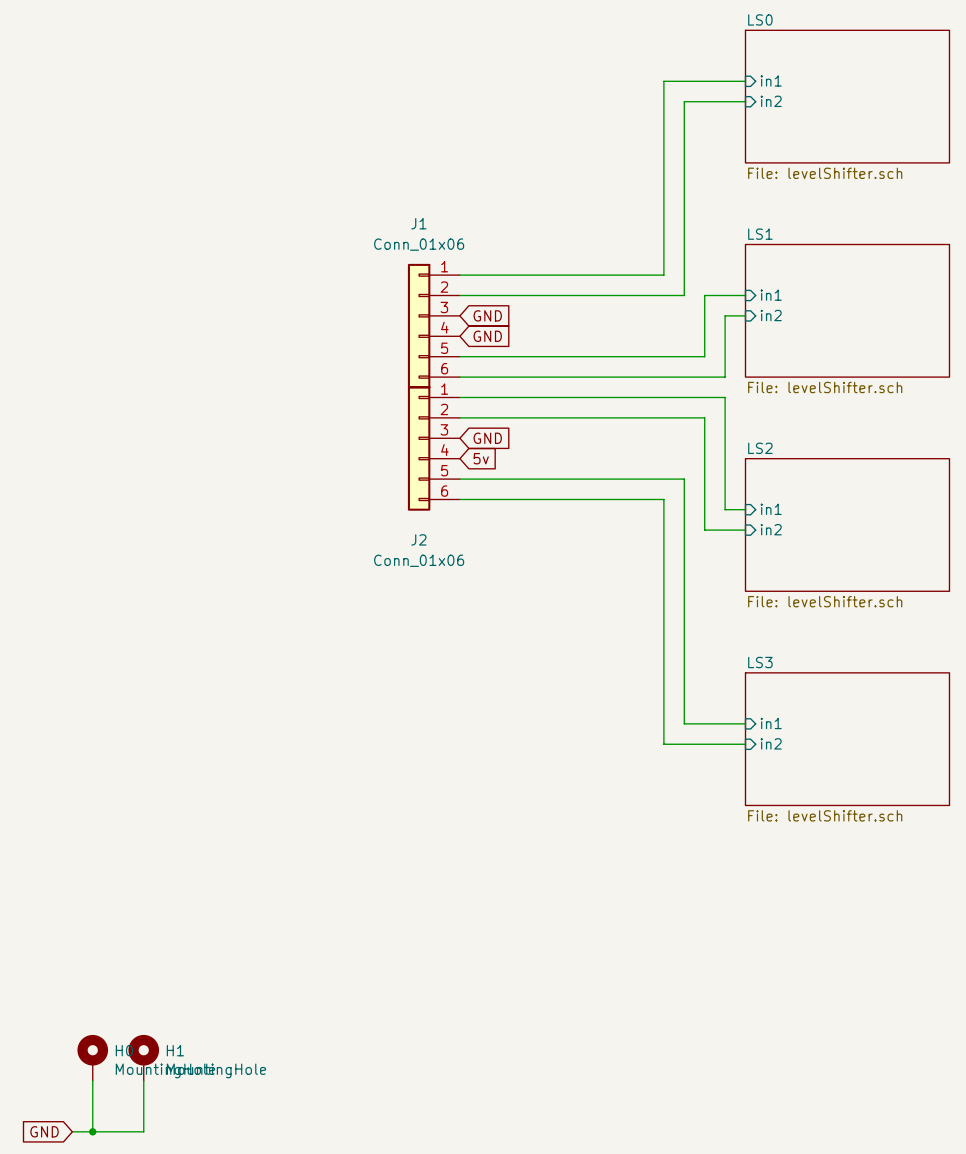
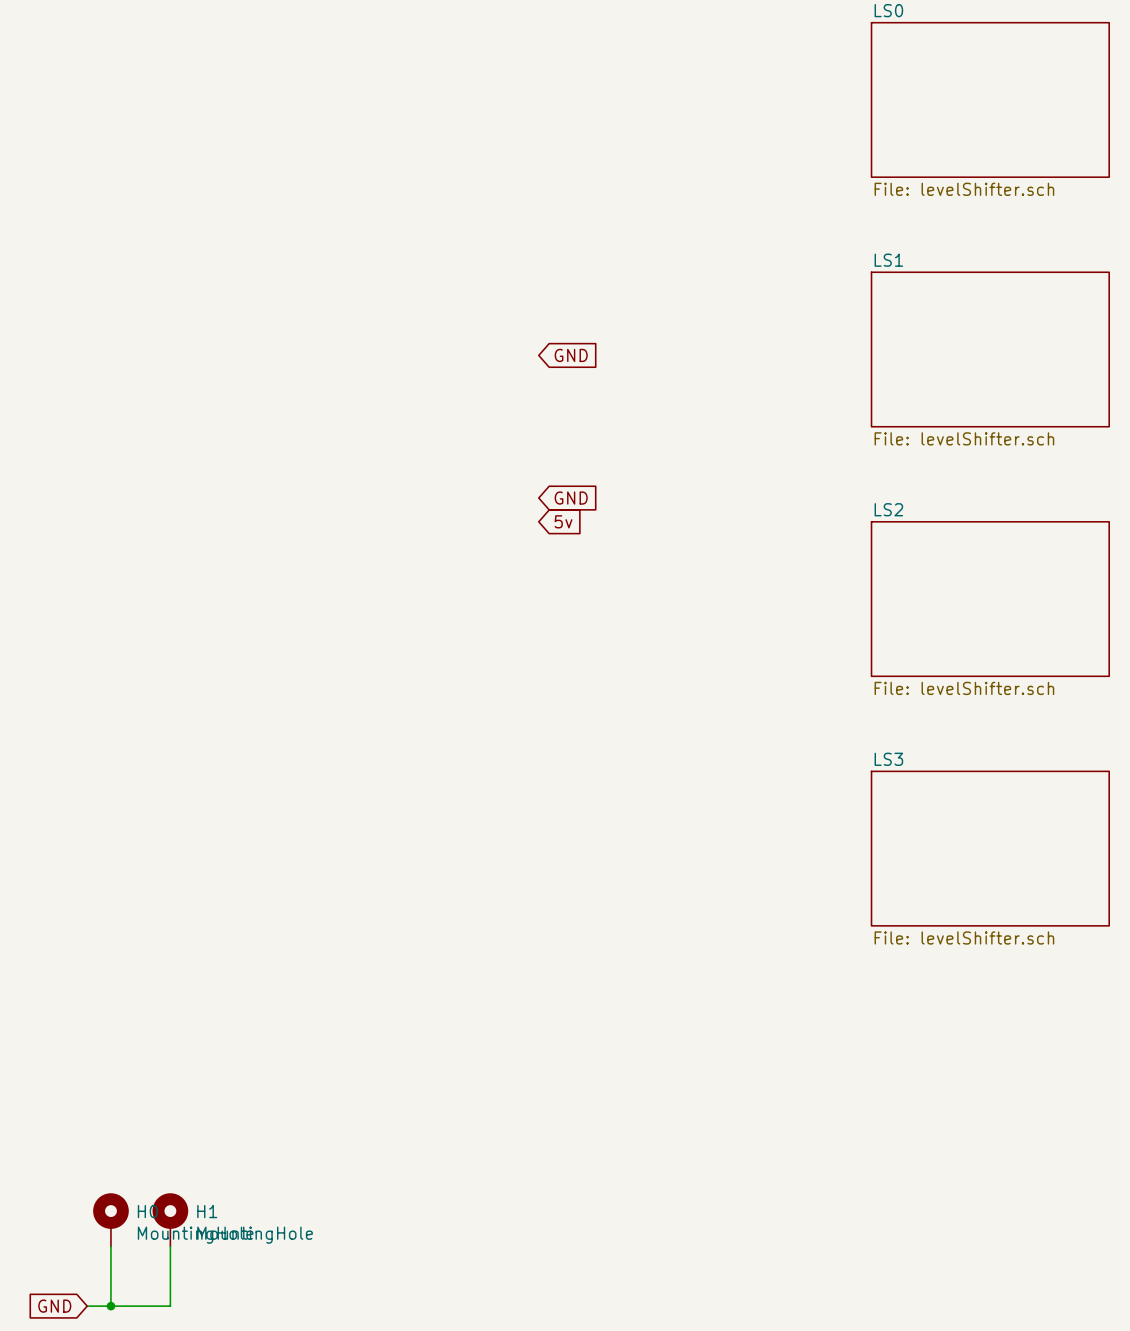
sheet pin: in1 (771, 80) -> none
wire: (745, 81) (663, 81) (663, 275) (459, 275) -> none
wire: (745, 101) (684, 101) (684, 295) (459, 295) -> none
sheet pin: in2 (771, 101) -> none
wire: (745, 295) (704, 295) (704, 356) (459, 356) -> none
sheet pin: in1 (771, 295) -> none
wire: (745, 315) (725, 315) (725, 377) (459, 377) -> none
sheet pin: in2 (771, 315) -> none
J1: Conn_01x06 (433, 326) -> none
global label: GND (487, 336) -> none
wire: (459, 397) (725, 397) (725, 509) (745, 509) -> none
wire: (459, 417) (704, 417) (704, 530) (745, 530) -> none
J2: Conn_01x06 (433, 448) -> none
wire: (459, 479) (684, 479) (684, 723) (745, 723) -> none
wire: (459, 499) (663, 499) (663, 744) (745, 744) -> none
sheet pin: in1 (771, 509) -> none
sheet pin: in2 (771, 529) -> none
sheet pin: in1 (771, 723) -> none
sheet pin: in2 (771, 743) -> none

